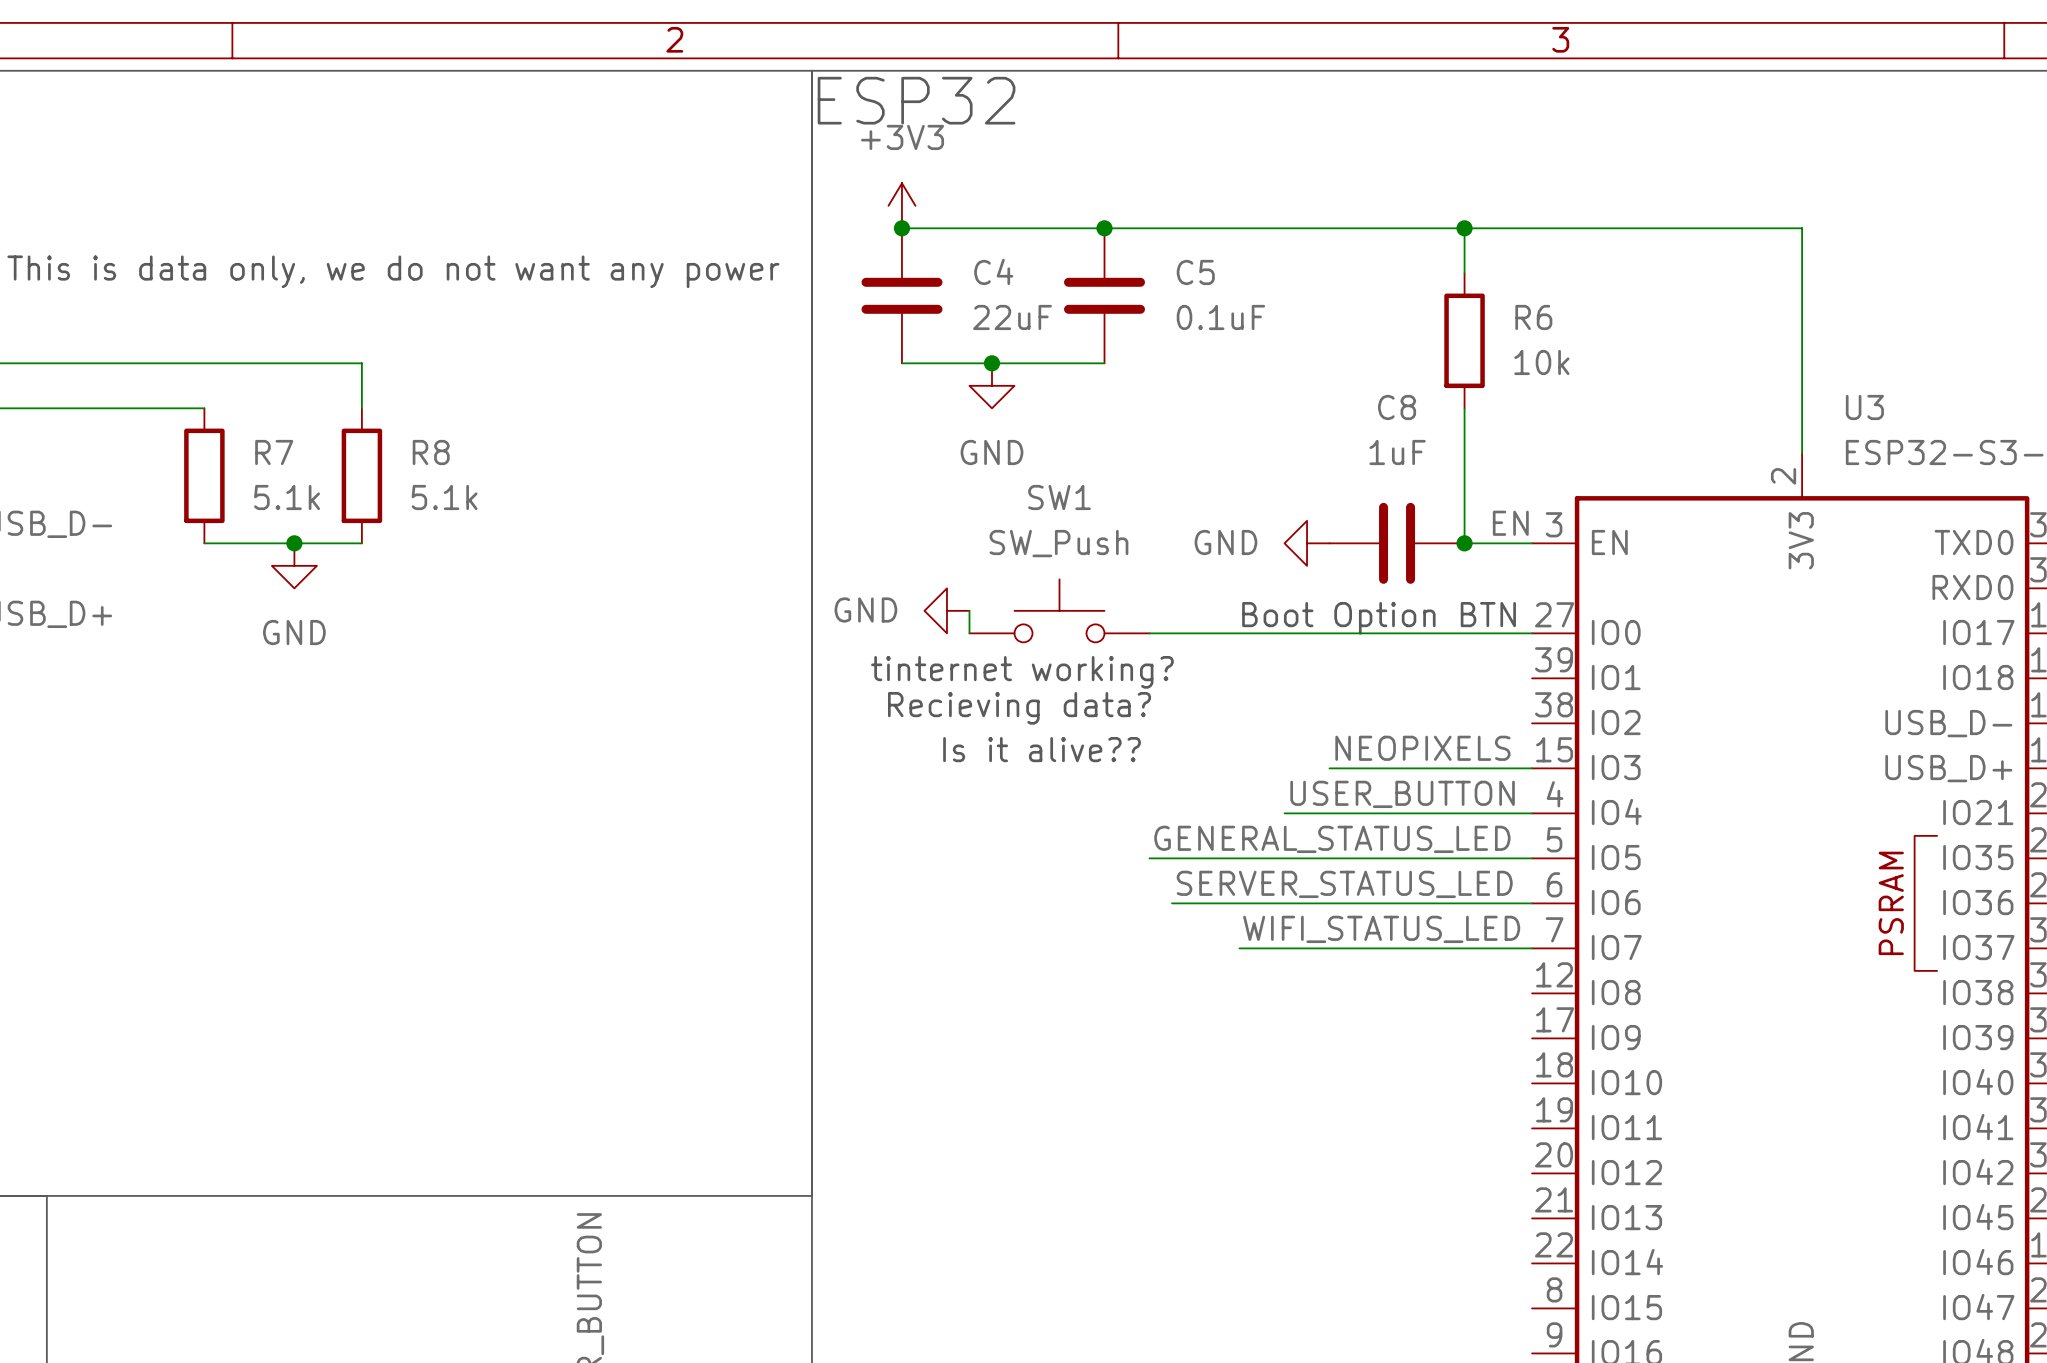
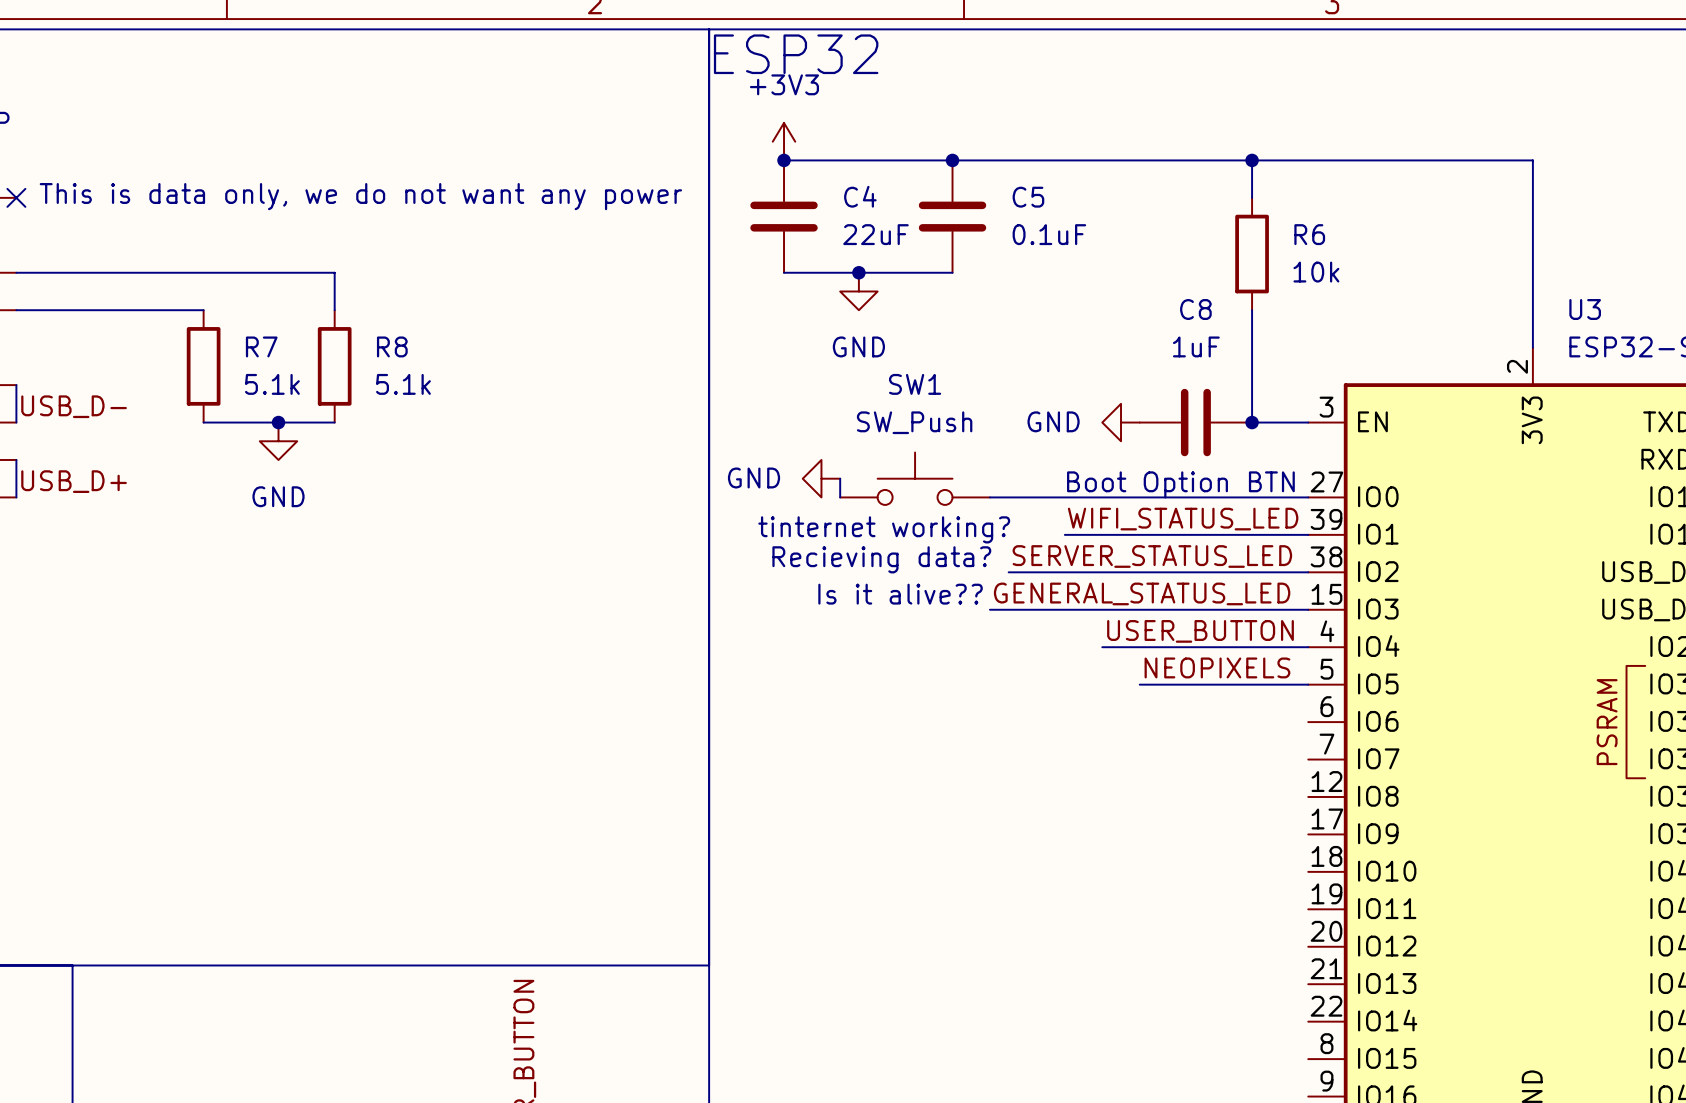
label: EN (1510, 523) -> none
label position: NEOPIXELS (1422, 748) -> NEOPIXELS (1217, 667)
label position: GENERAL_STATUS_LED (1332, 839) -> GENERAL_STATUS_LED (1142, 593)
wire: (1149, 858) (1329, 858) -> (989, 609) (1139, 609)
label position: SERVER_STATUS_LED (1344, 884) -> SERVER_STATUS_LED (1152, 556)
wire: (1172, 903) (1532, 903) -> (1008, 572) (1308, 572)
label position: WIFI_STATUS_LED (1381, 929) -> WIFI_STATUS_LED (1183, 519)
wire: (1239, 948) (1532, 948) -> (1064, 534) (1308, 534)

